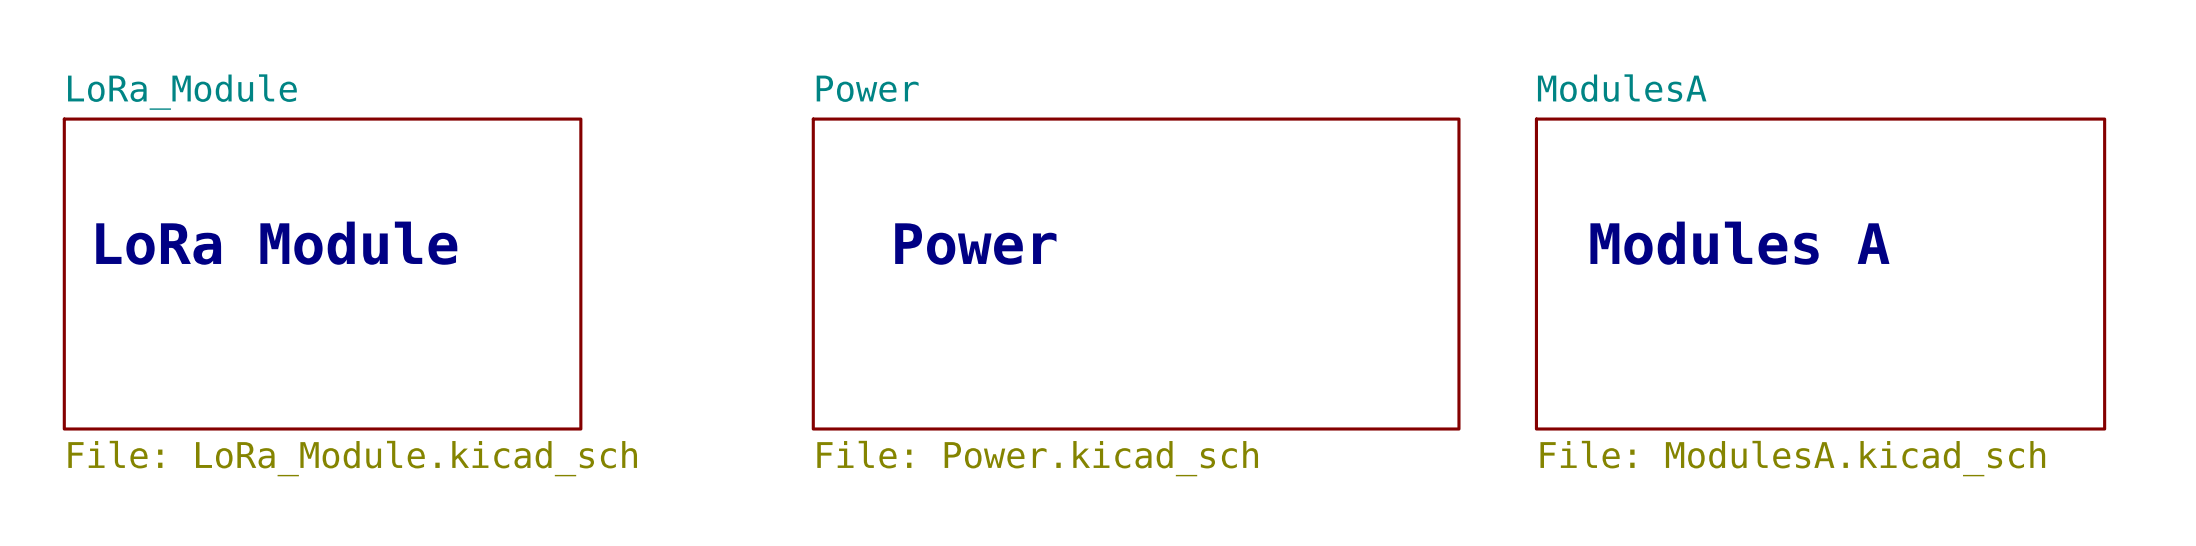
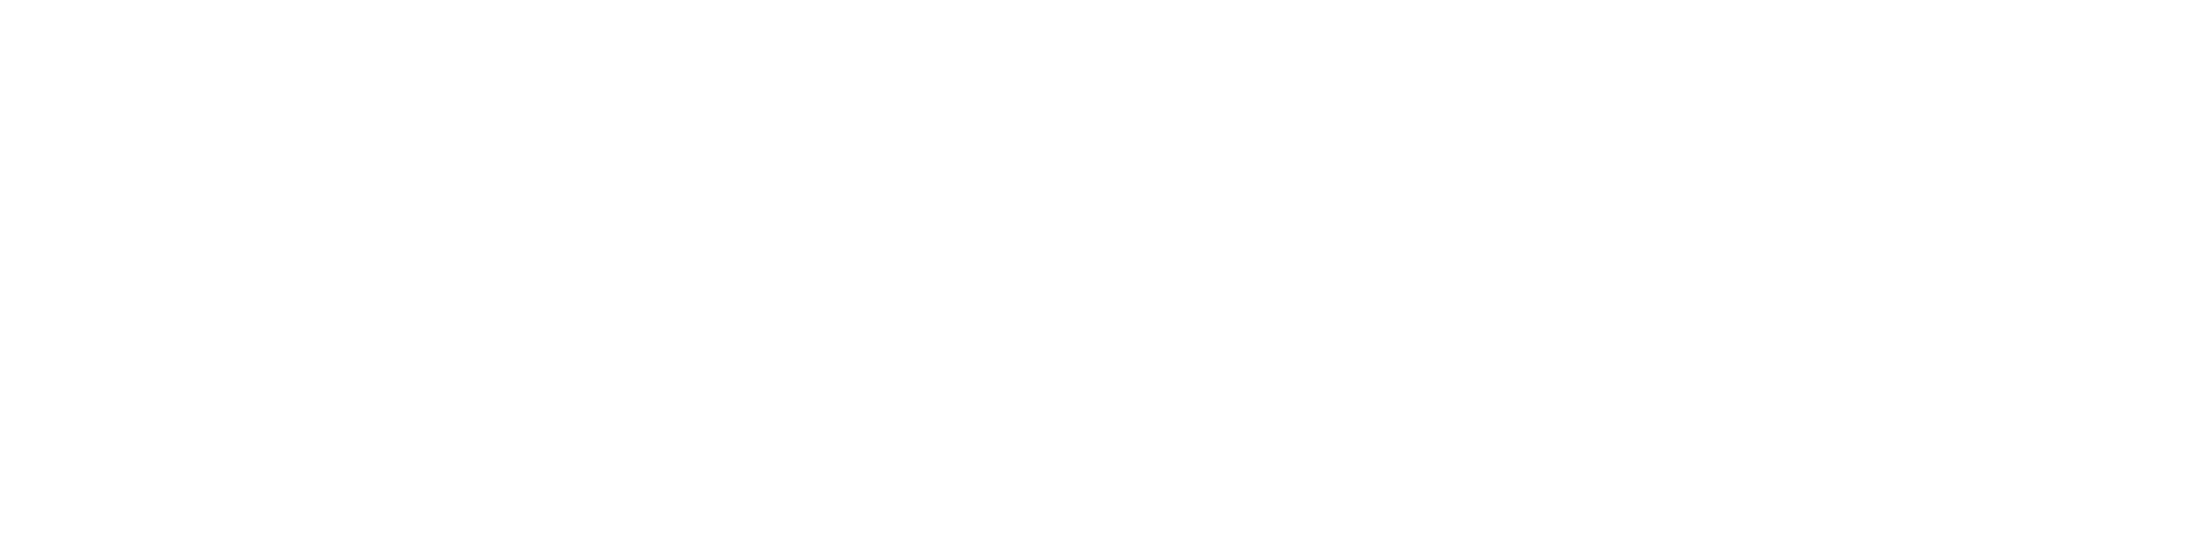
text: LoRa Module (276, 243) -> none
text: Modules A (1739, 243) -> none
text: Power (975, 244) -> none
sheet LoRa_Module: File: LoRa_Module.kicad_sch (322, 274) -> none
sheet Power: File: Power.kicad_sch (1136, 274) -> none
sheet ModulesA: File: ModulesA.kicad_sch (1820, 274) -> none

